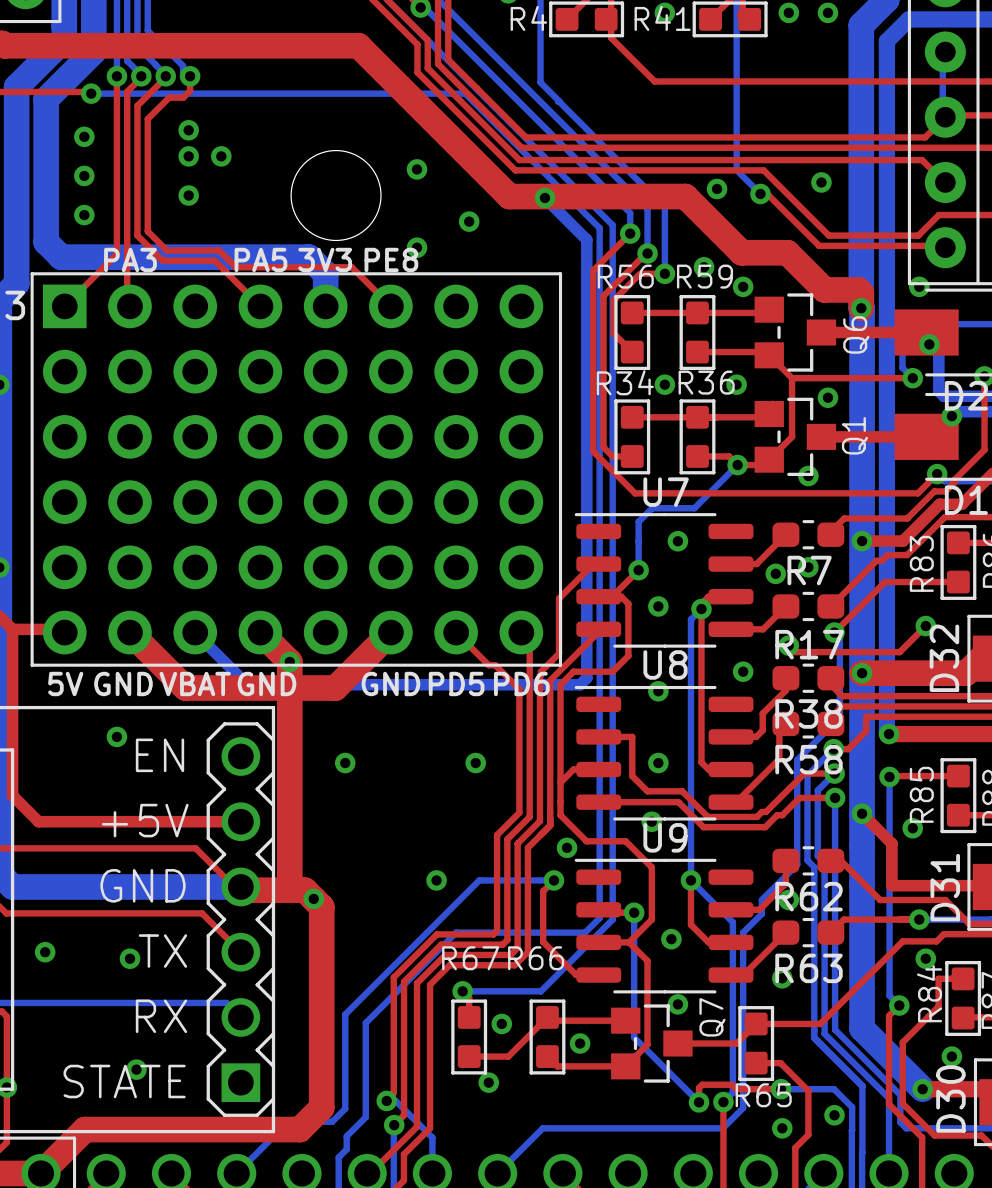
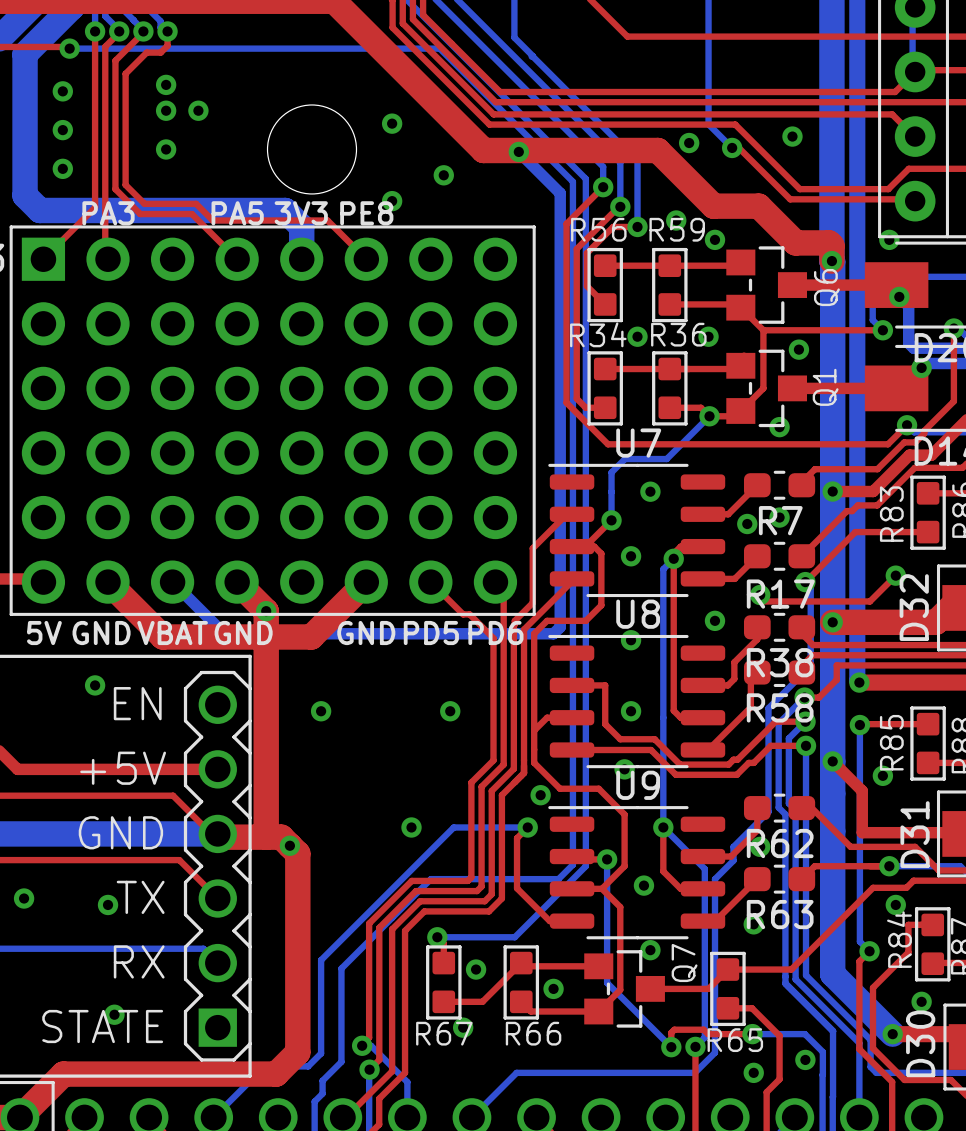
R67 name position: R67 (470, 958) -> R67 (444, 1033)
R66 name position: R66 (536, 958) -> R66 (533, 1033)

